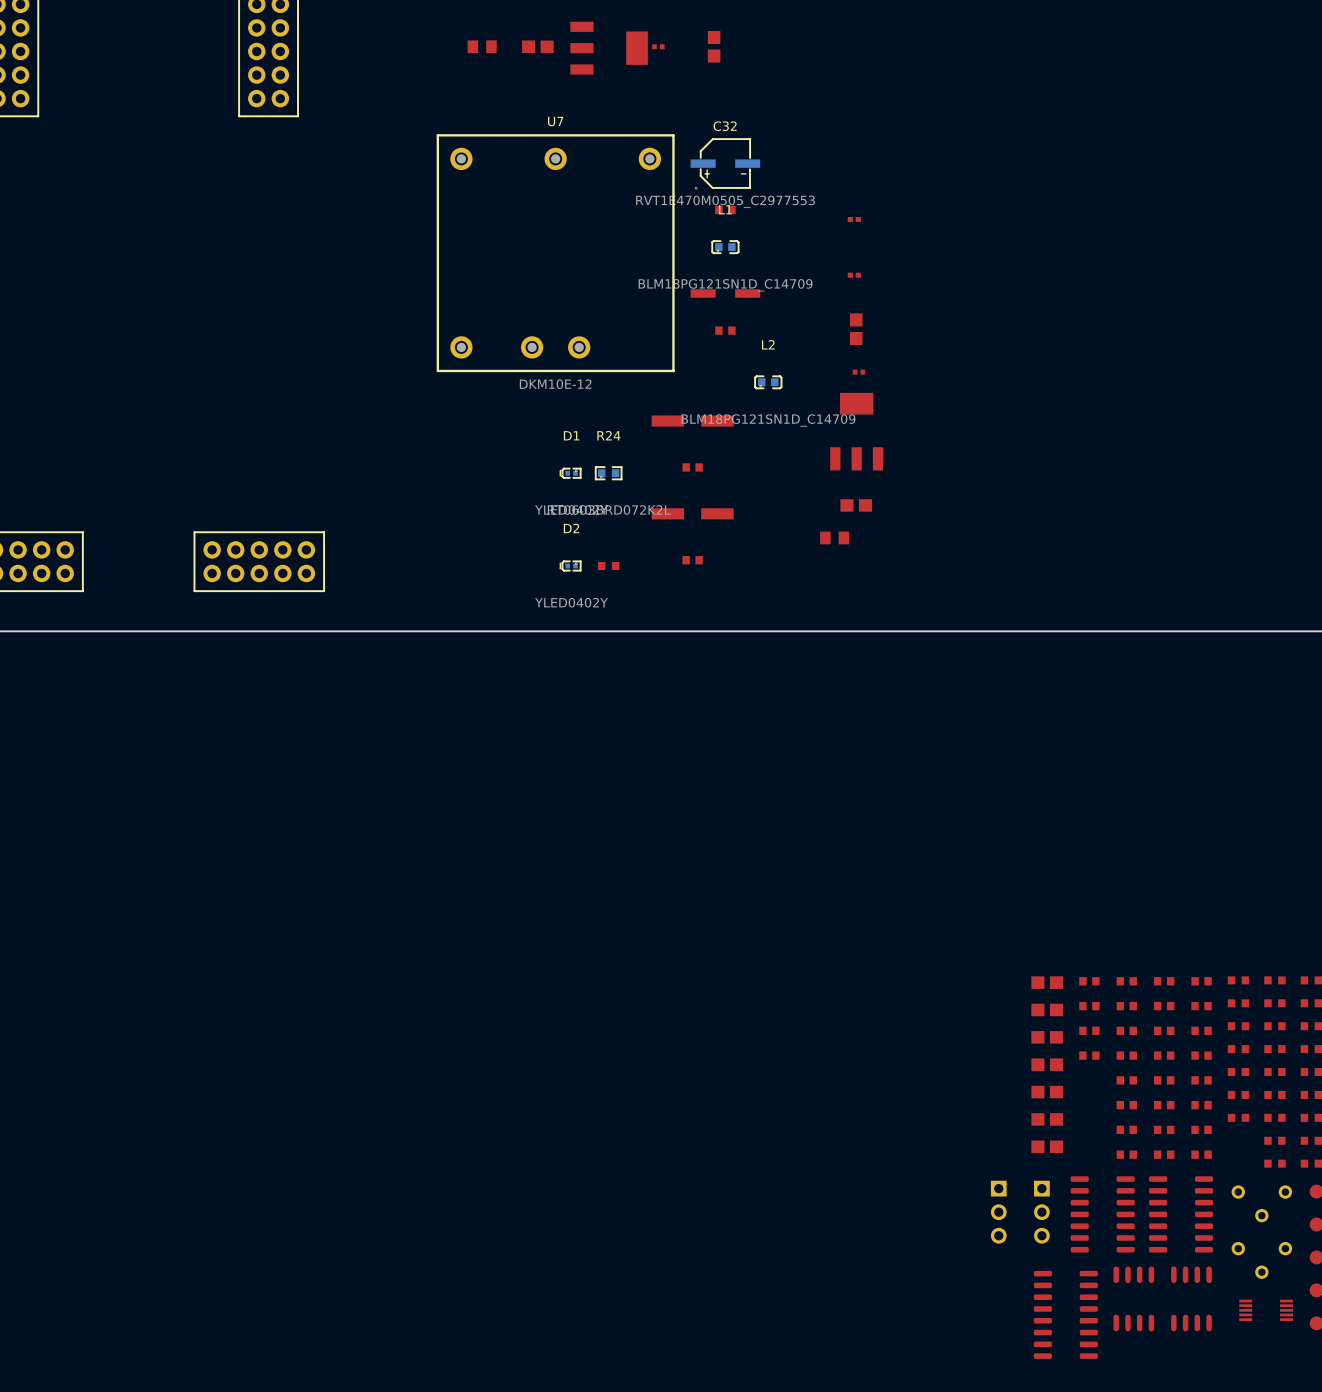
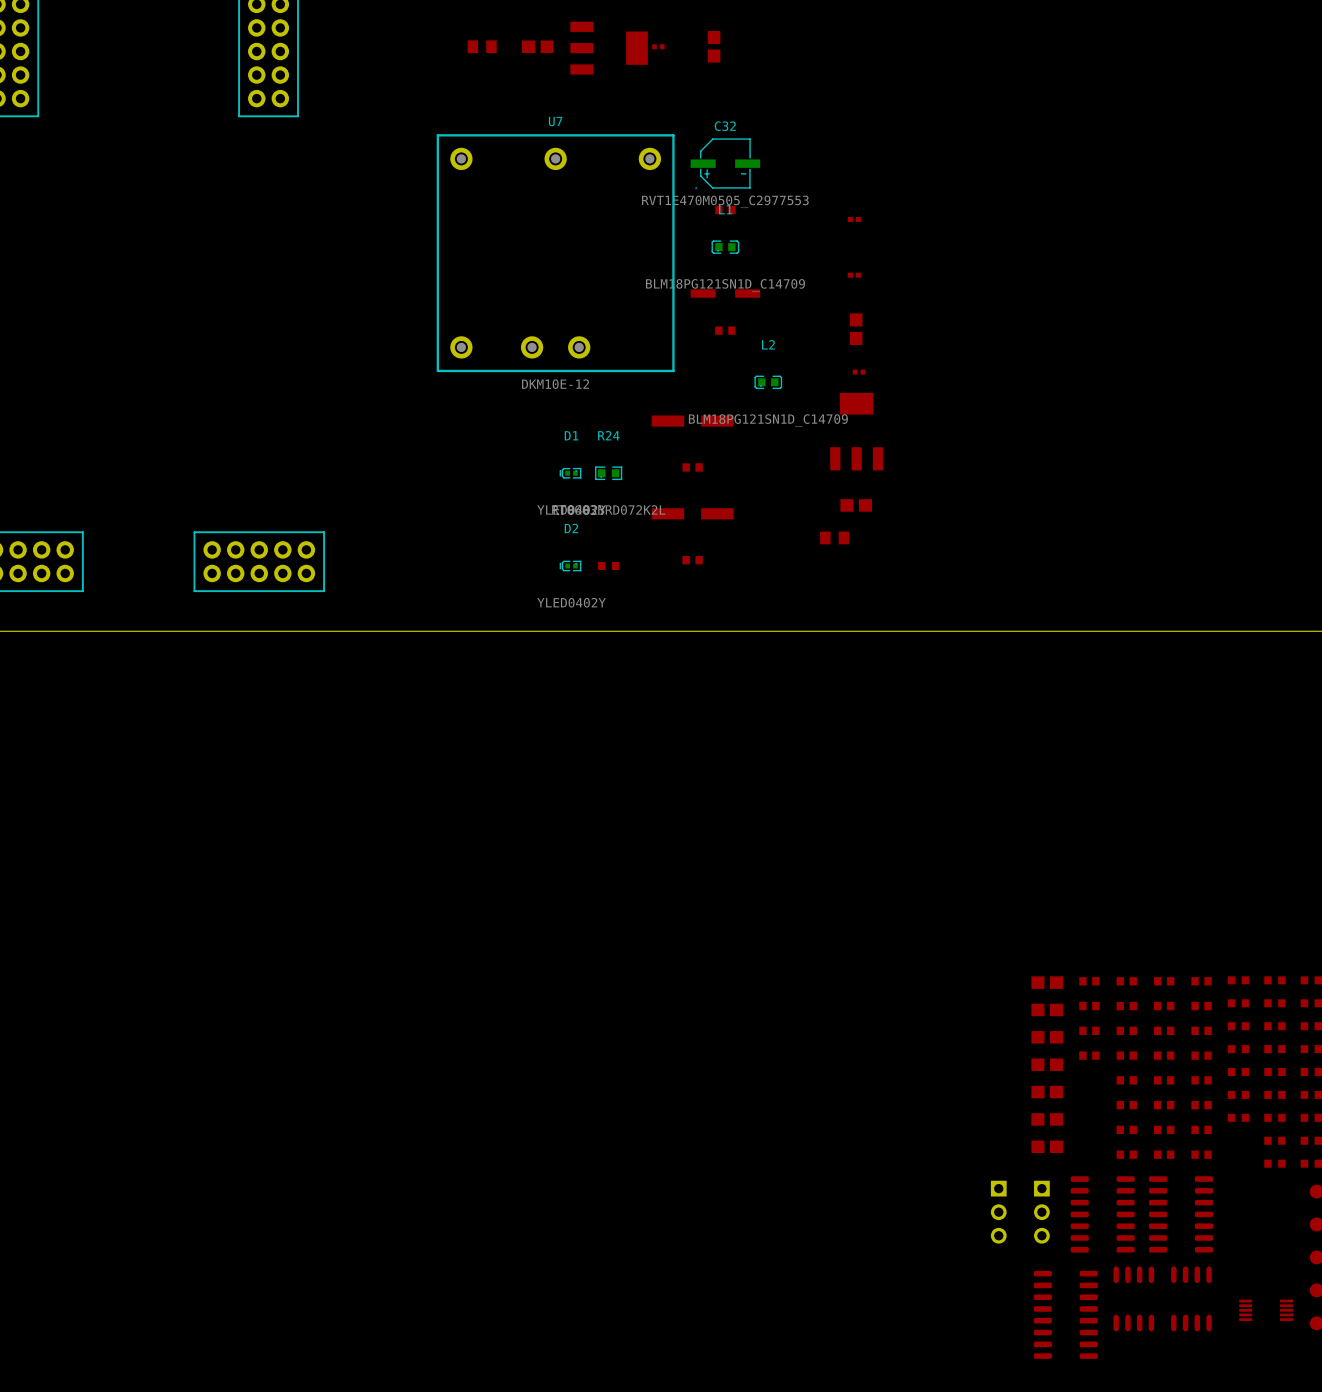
part: (1261, 1203) -> none
part: (1261, 1260) -> none

